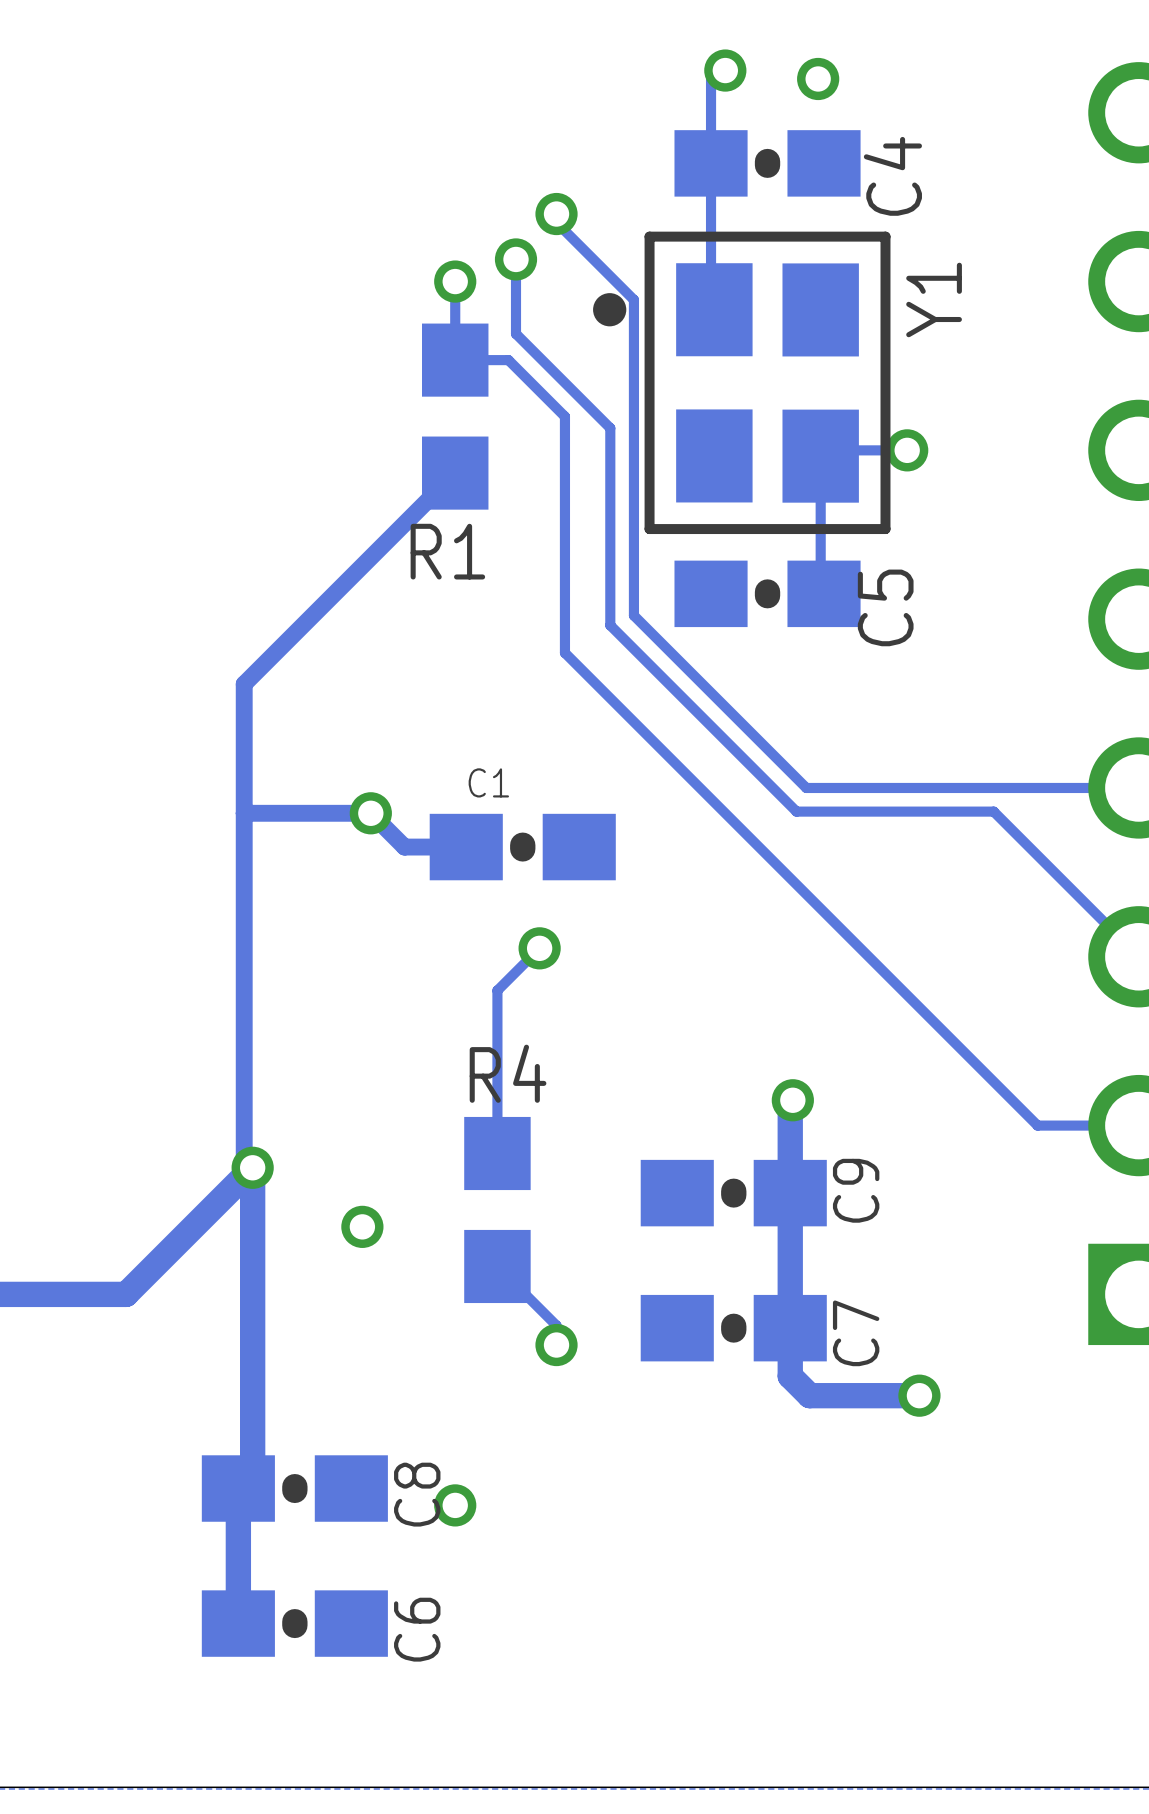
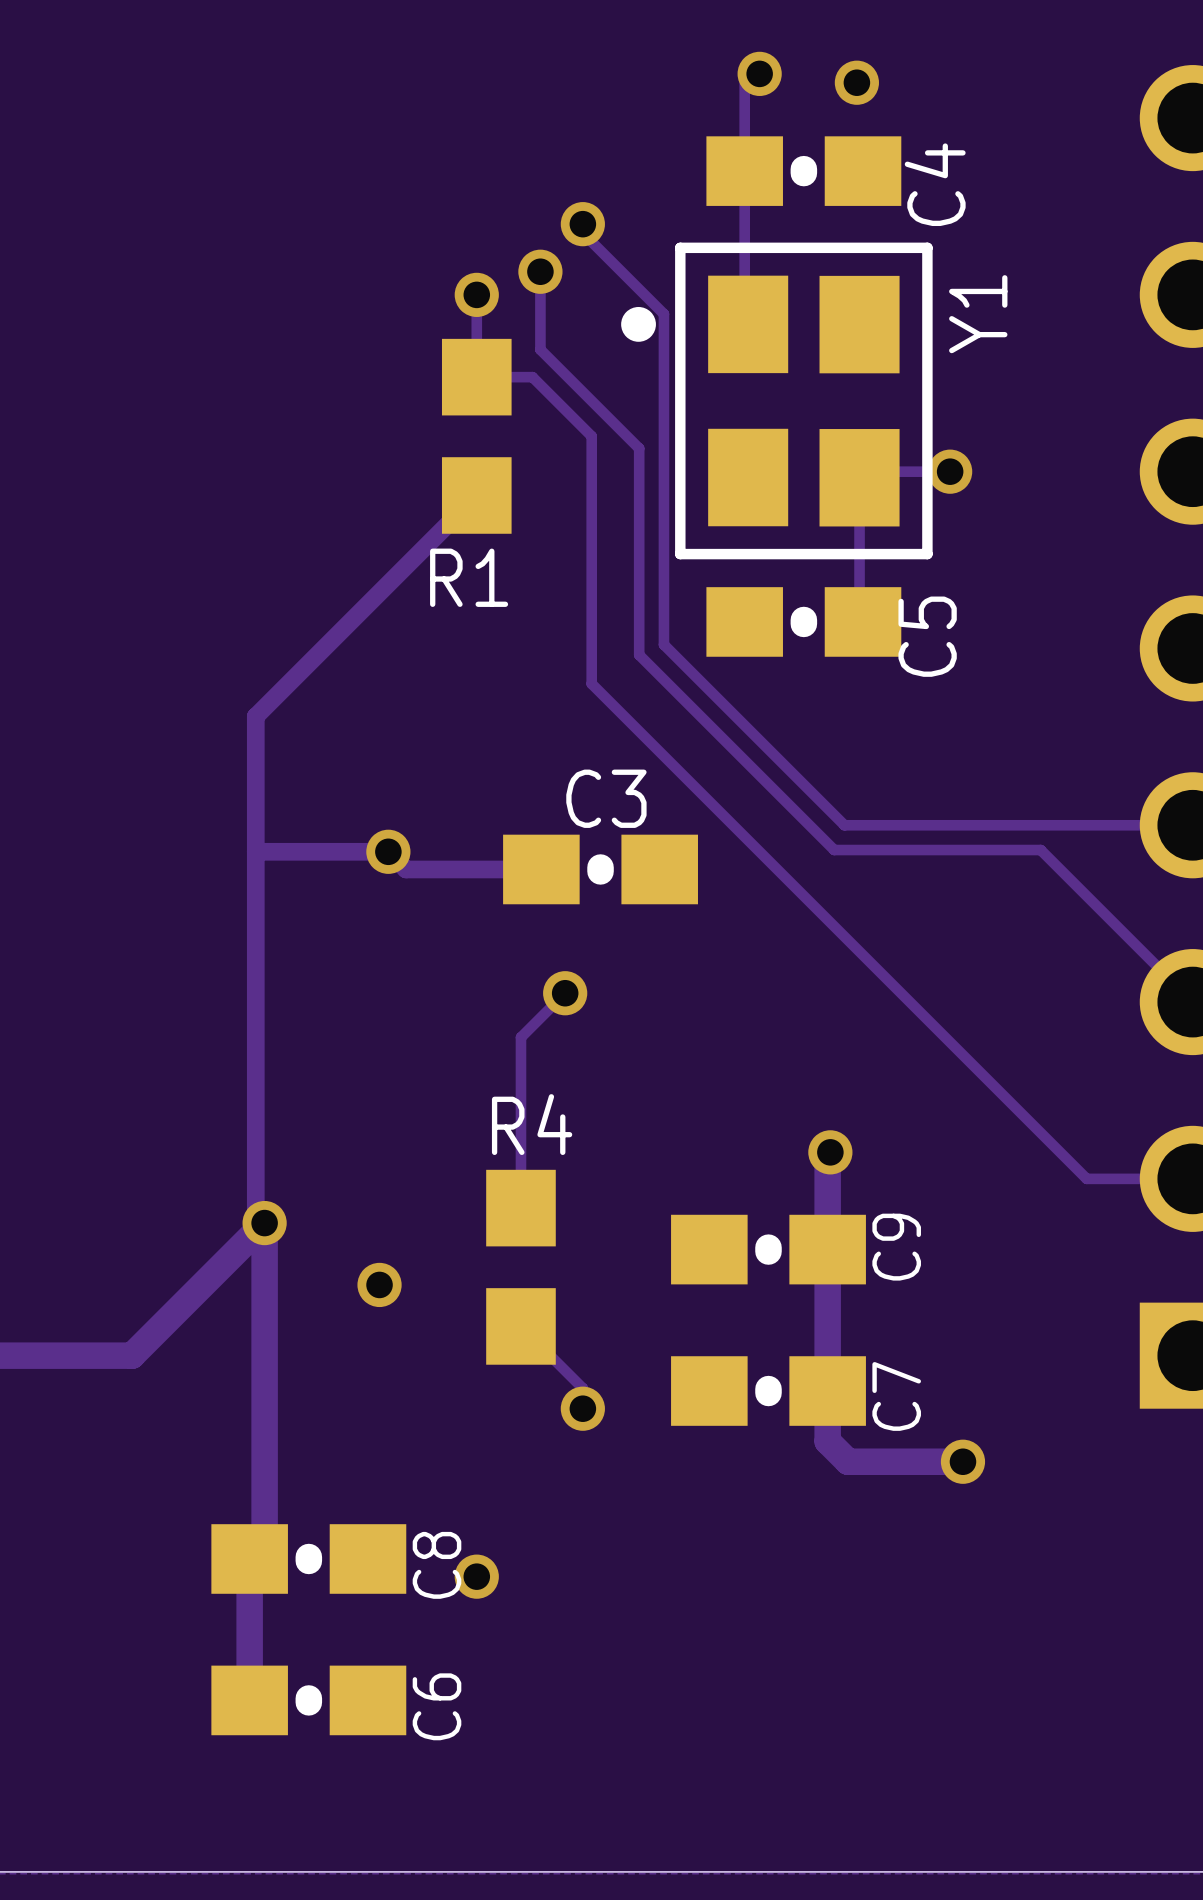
C1 name: C1 (488, 782) -> C3 (606, 798)
track: (387, 830) (404, 847) (466, 847) -> (406, 869) (541, 869)
C1 position: (522, 847) -> (600, 869)

